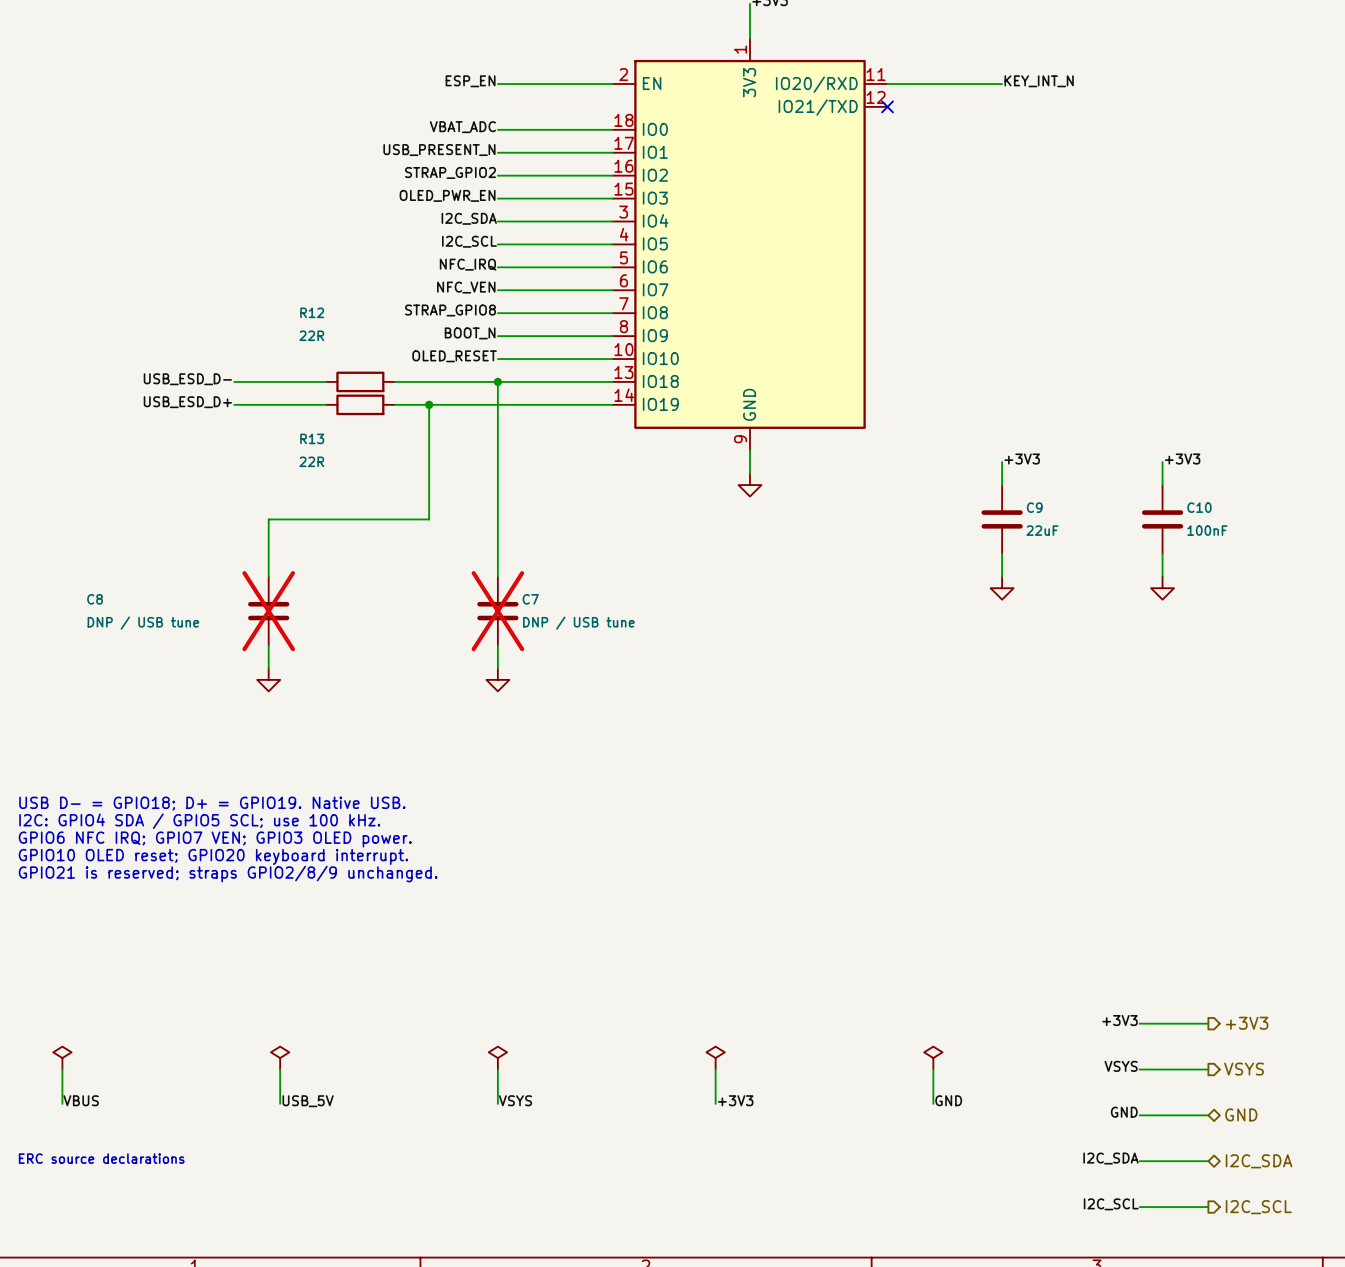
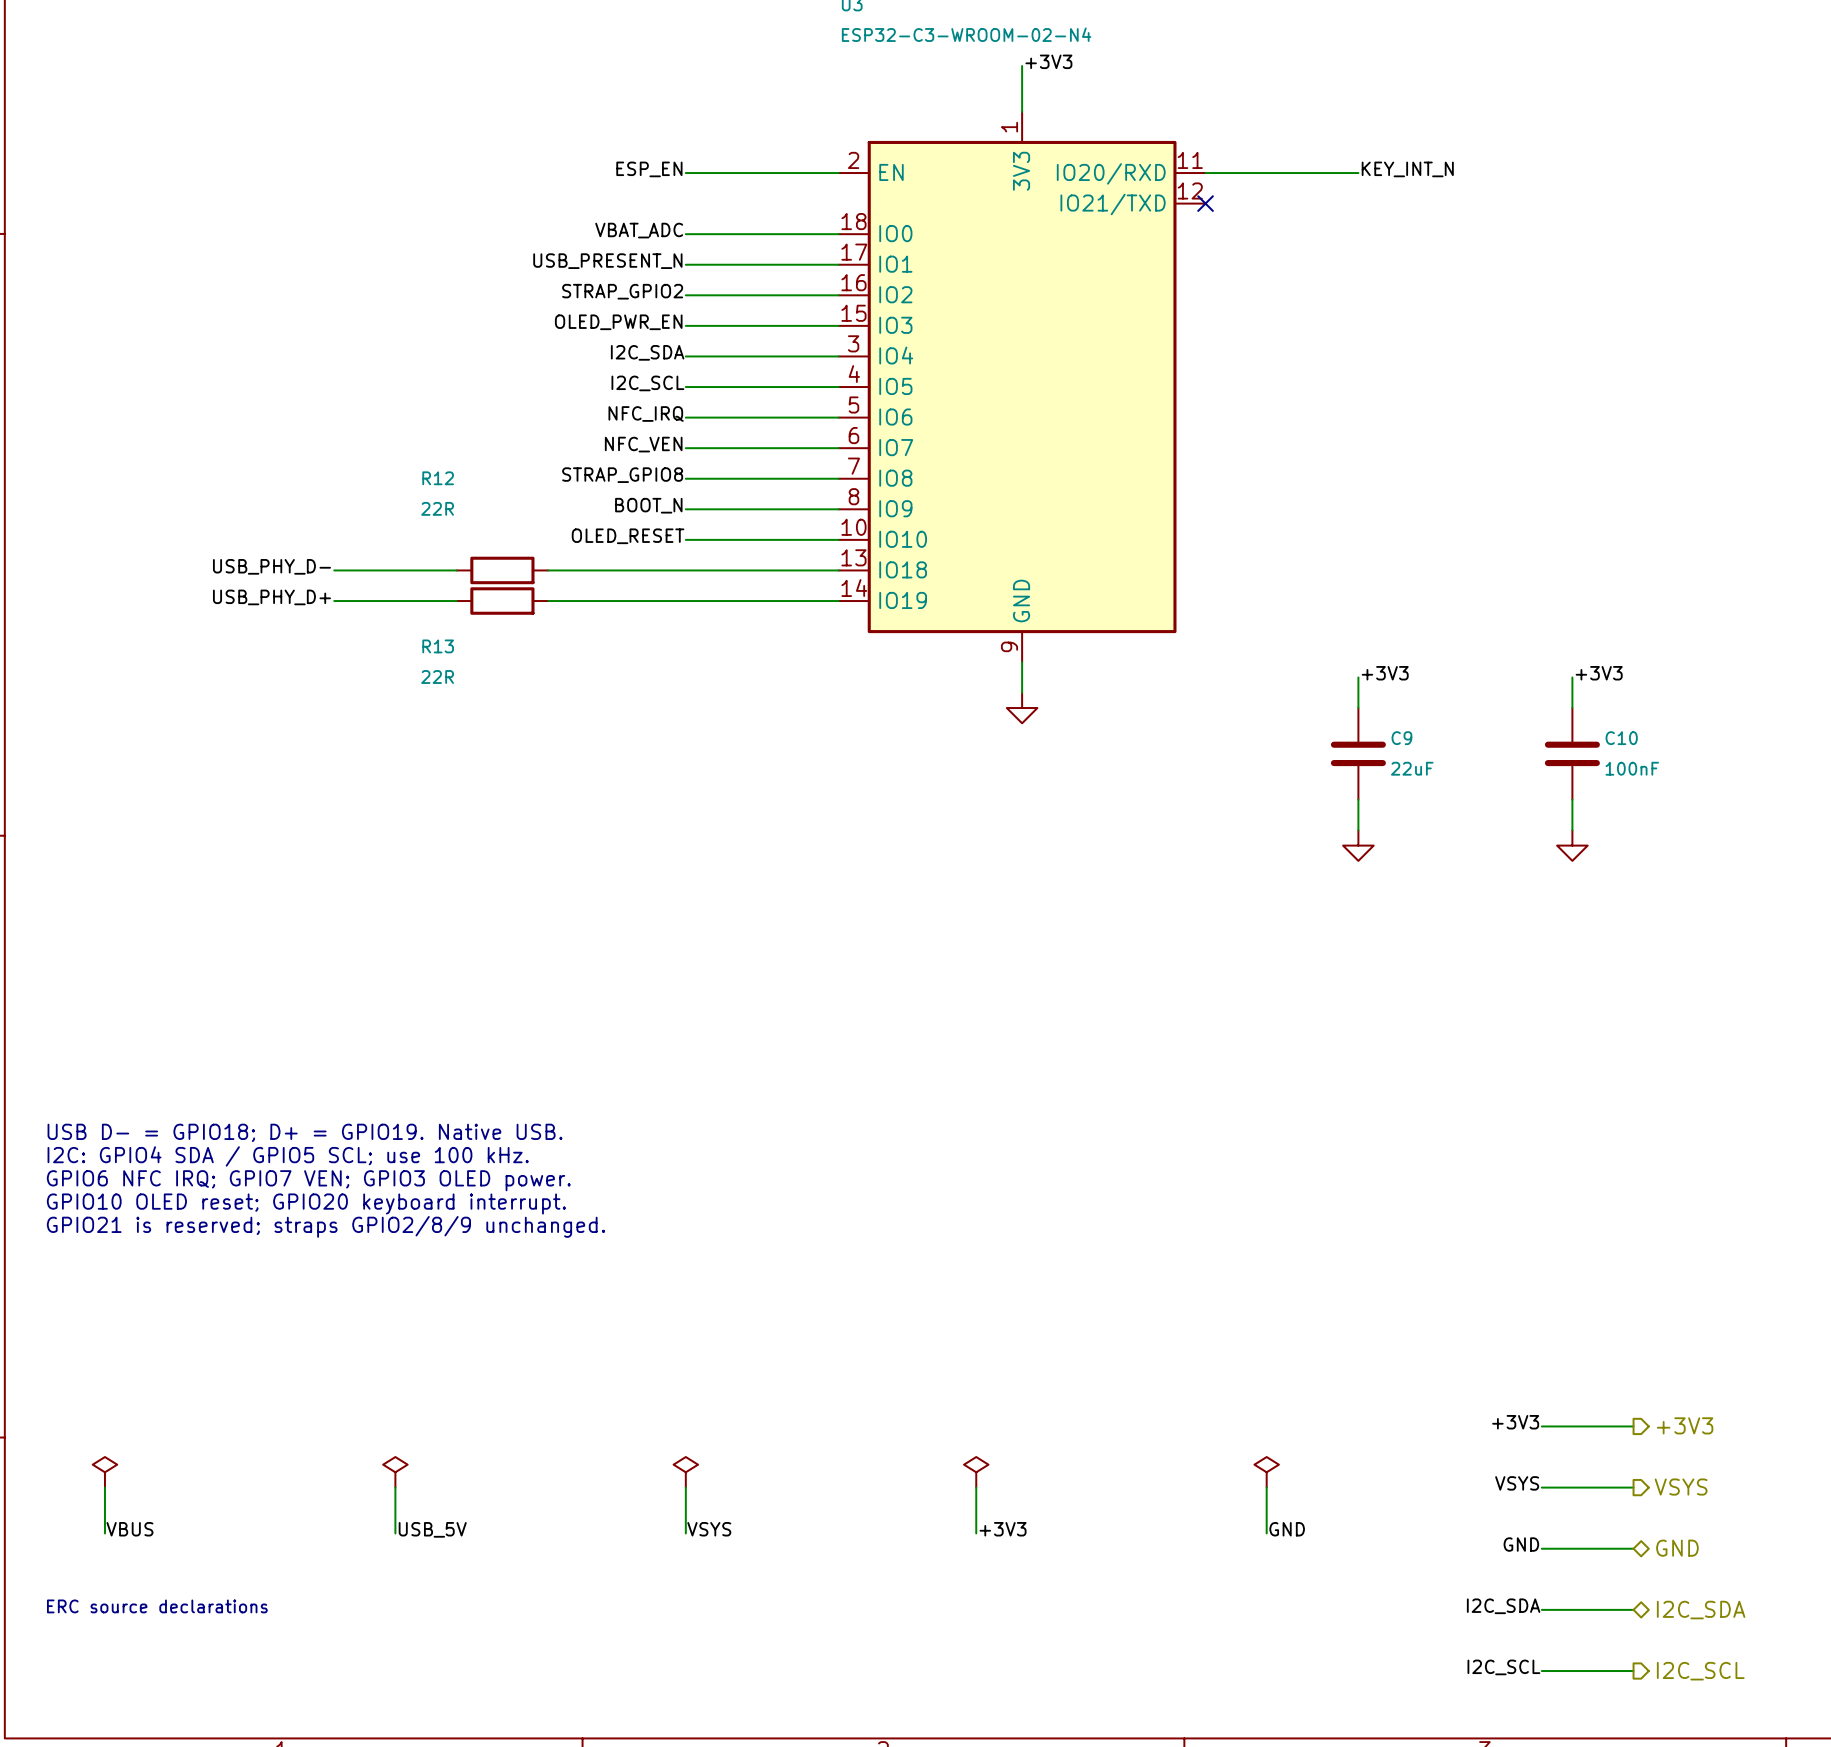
label: USB_ESD_D- (187, 379) -> USB_PHY_D- (271, 566)
wire: (497, 381) (497, 576) -> none
junction: (497, 381) -> none
label: USB_ESD_D+ (187, 402) -> USB_PHY_D+ (271, 597)
wire: (429, 404) (429, 519) (268, 519) (268, 576) -> none
junction: (429, 404) -> none
C8: DNP / USB tune (268, 611) -> none
C7: DNP / USB tune (497, 611) -> none
wire: (268, 645) (268, 668) -> none
wire: (497, 645) (497, 668) -> none
power symbol: (268, 679) -> none
power symbol: (497, 679) -> none

